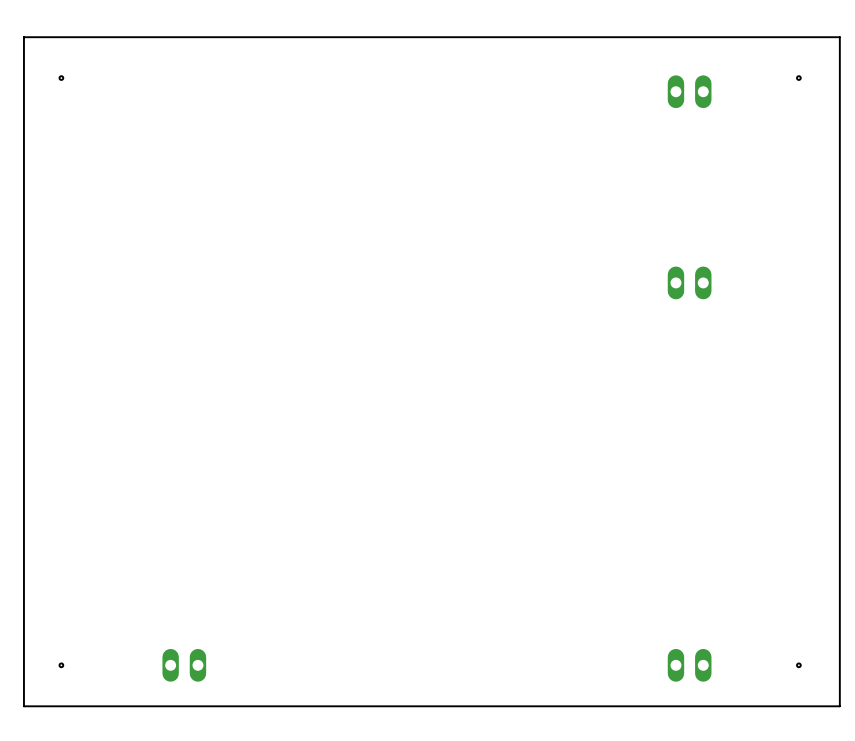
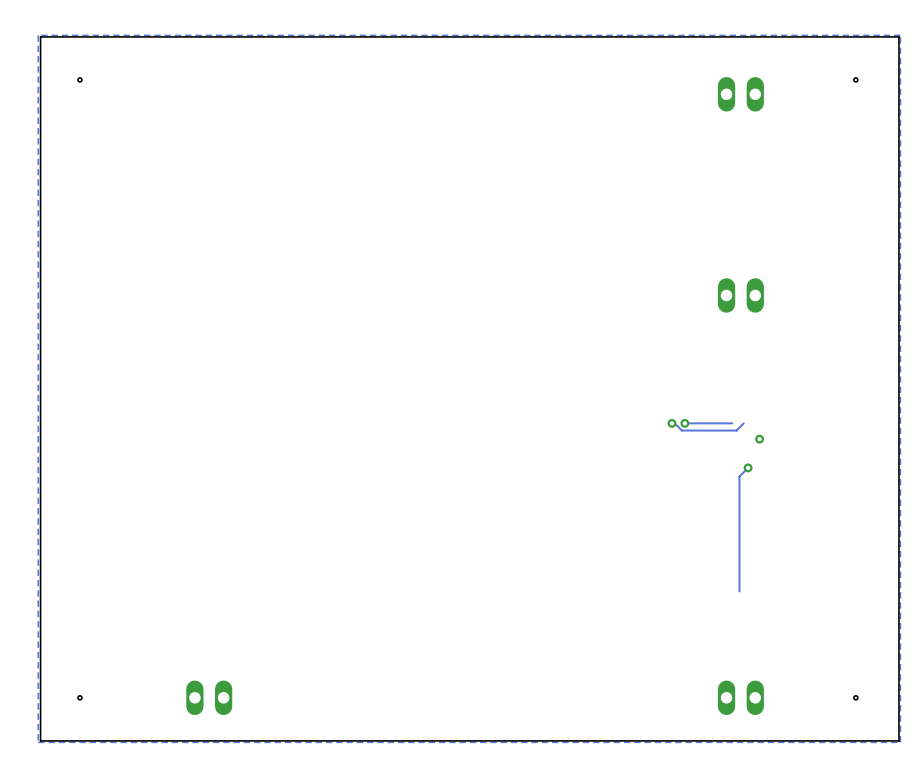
zone outline: none -> (900, 35) (38, 35) (38, 742) (900, 742) (900, 35)
via: none -> (671, 423)
via: none -> (684, 423)
track: none -> (732, 423) (684, 423)
track: none -> (743, 423) (736, 430) (681, 430) (674, 423) (671, 423)
via: none -> (759, 439)
track: none -> (748, 467) (739, 476) (739, 591)
via: none -> (748, 467)

